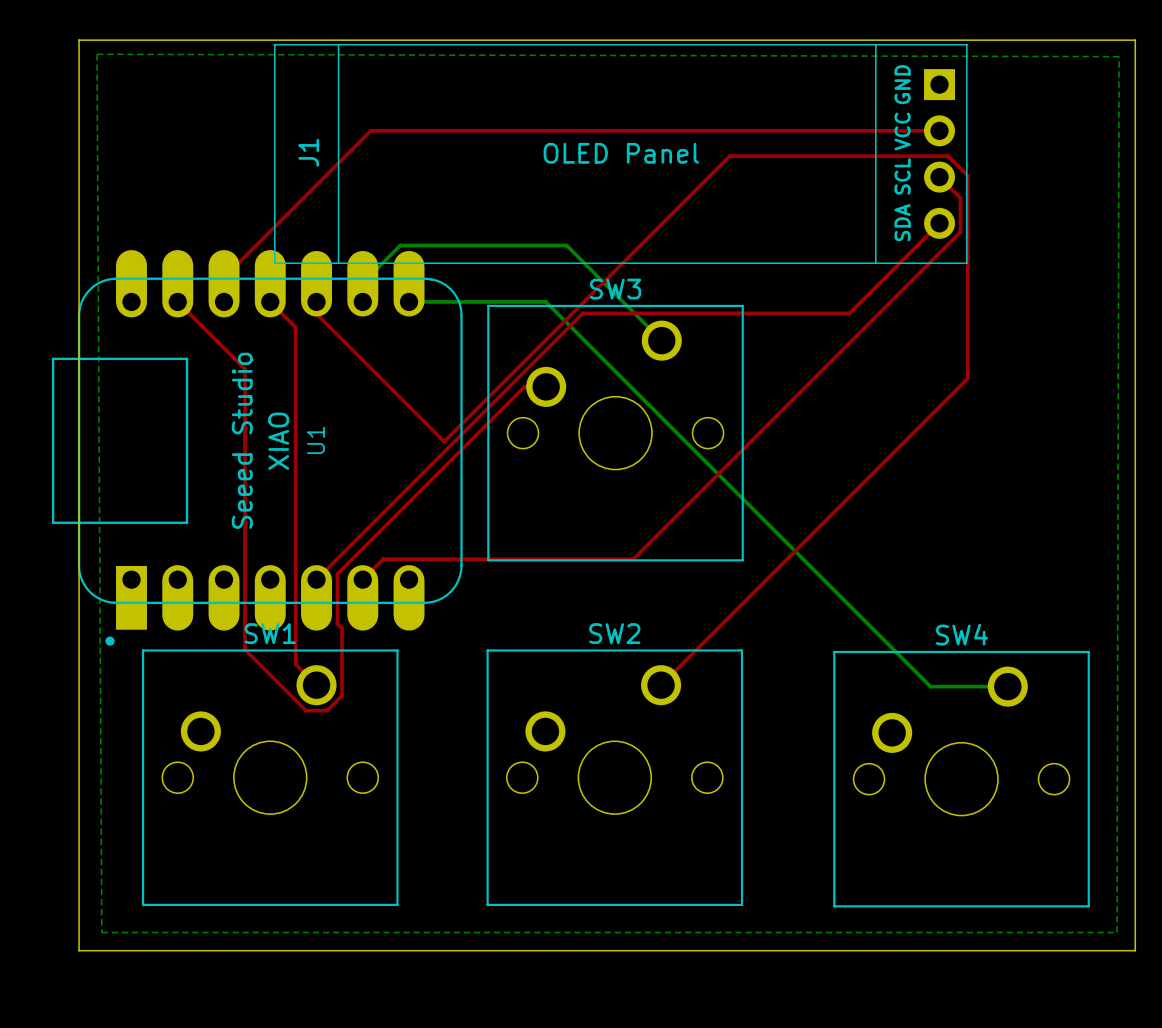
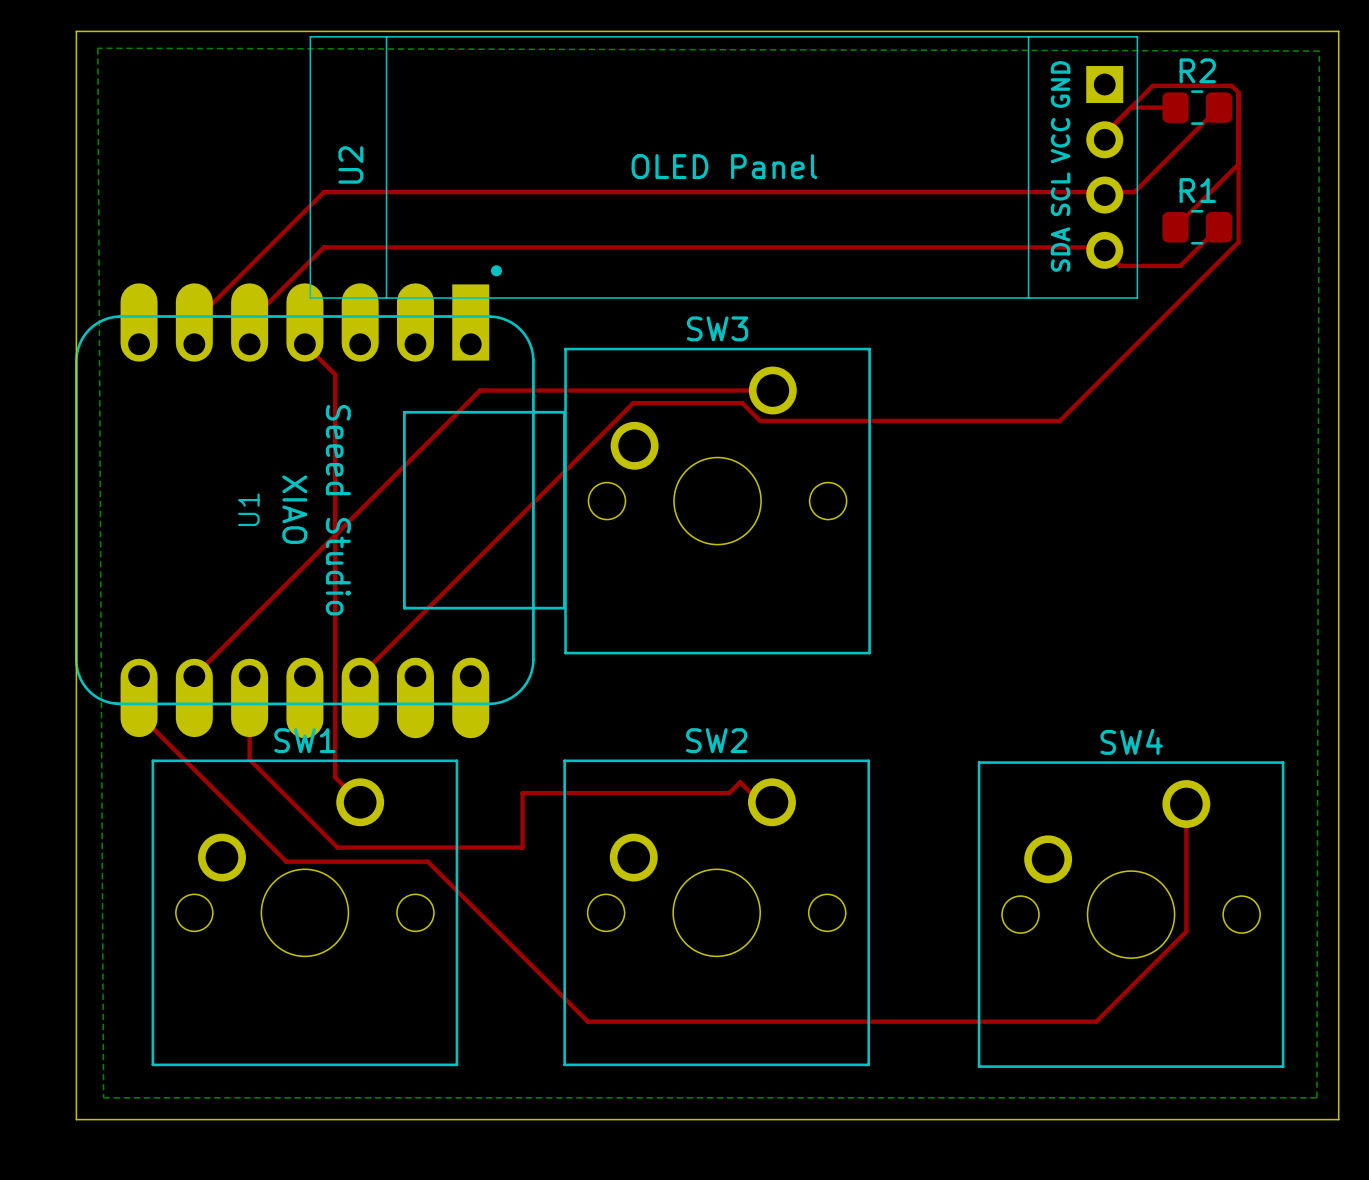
top track: none -> (1131, 107) (1175, 107)
R2: none -> (1197, 107)
top track: (939, 130) (370, 130) (224, 277) (224, 283) -> (1218, 227) (1180, 265) (1120, 265) (1101, 247) (323, 247) (249, 321)
top track: none -> (1238, 164) (1175, 227)
J1 name: J1 (308, 152) -> U2 (350, 164)
top track: (939, 177) (960, 198) (960, 232) (633, 559) (383, 559) (362, 579) -> none
R1: none -> (1197, 227)
top track: (939, 223) (849, 313) (582, 313) (544, 351) -> (1101, 136) (1152, 85) (1231, 85) (1238, 92) (1238, 242) (1059, 420) (760, 420) (742, 403) (633, 403)
top track: (177, 301) (244, 369) (244, 649) (305, 710) (327, 710) (342, 695) (342, 628) (337, 623) (337, 573) (524, 386) (546, 386) -> (194, 344) (194, 321) (323, 192) (1134, 192) (1218, 107)
top track: (316, 301) (316, 314) (444, 441) (729, 156) (948, 156) (967, 175) (967, 378) (661, 685) -> (249, 676) (249, 759) (337, 847) (522, 847) (522, 793) (729, 793) (740, 782) (760, 802) (771, 802)
bottom track: (362, 301) (362, 283) (400, 245) (566, 245) (661, 340) -> none
bottom track: (409, 301) (545, 301) (930, 686) (1007, 686) -> none
top track: none -> (772, 390) (480, 390) (194, 676)
U1 rotation: 0° (257, 447) -> 180° (320, 501)
top track: none -> (139, 676) (139, 714) (286, 861) (427, 861) (587, 1021) (1096, 1021) (1186, 931) (1186, 804)

